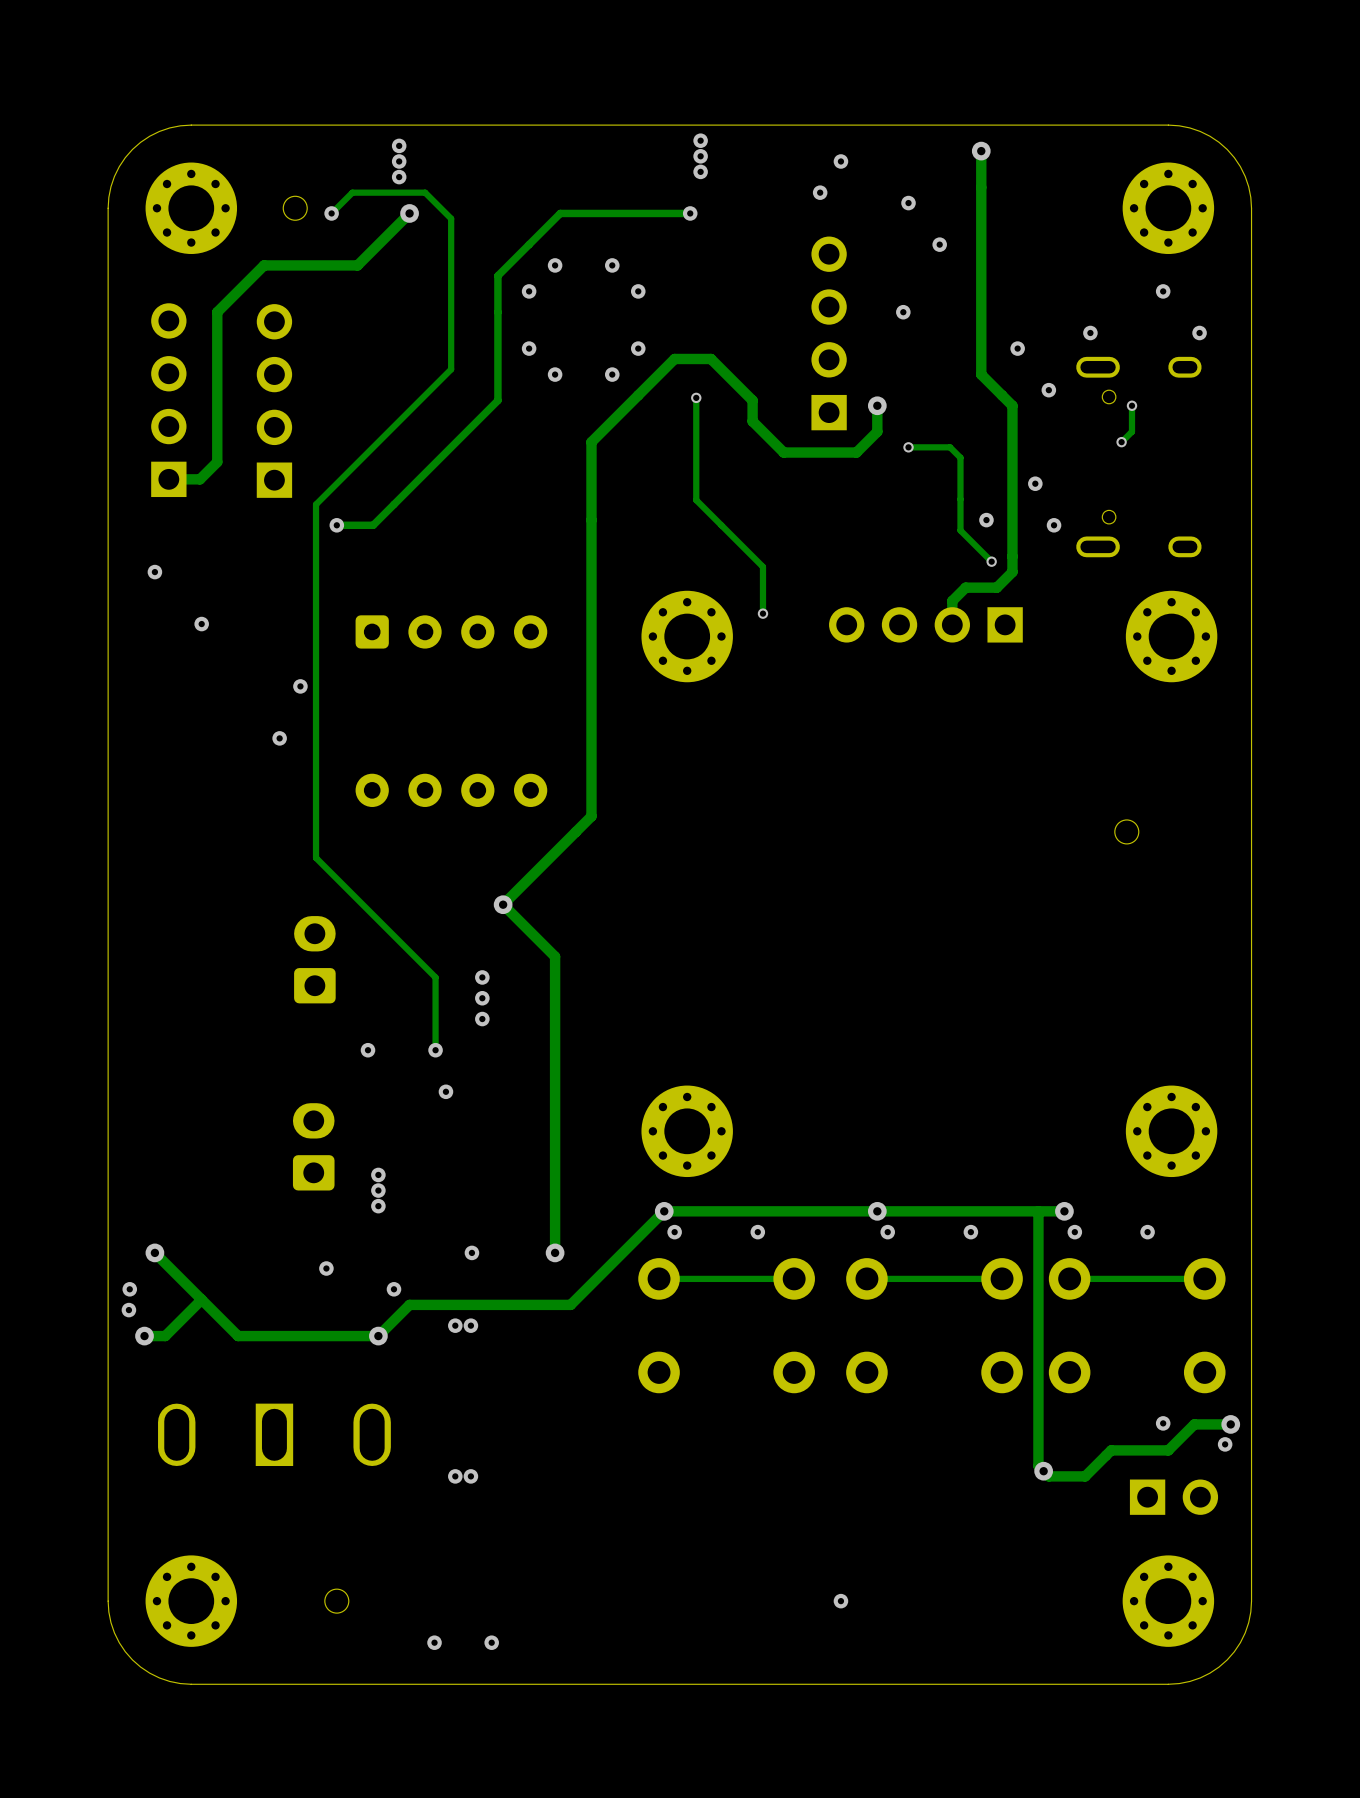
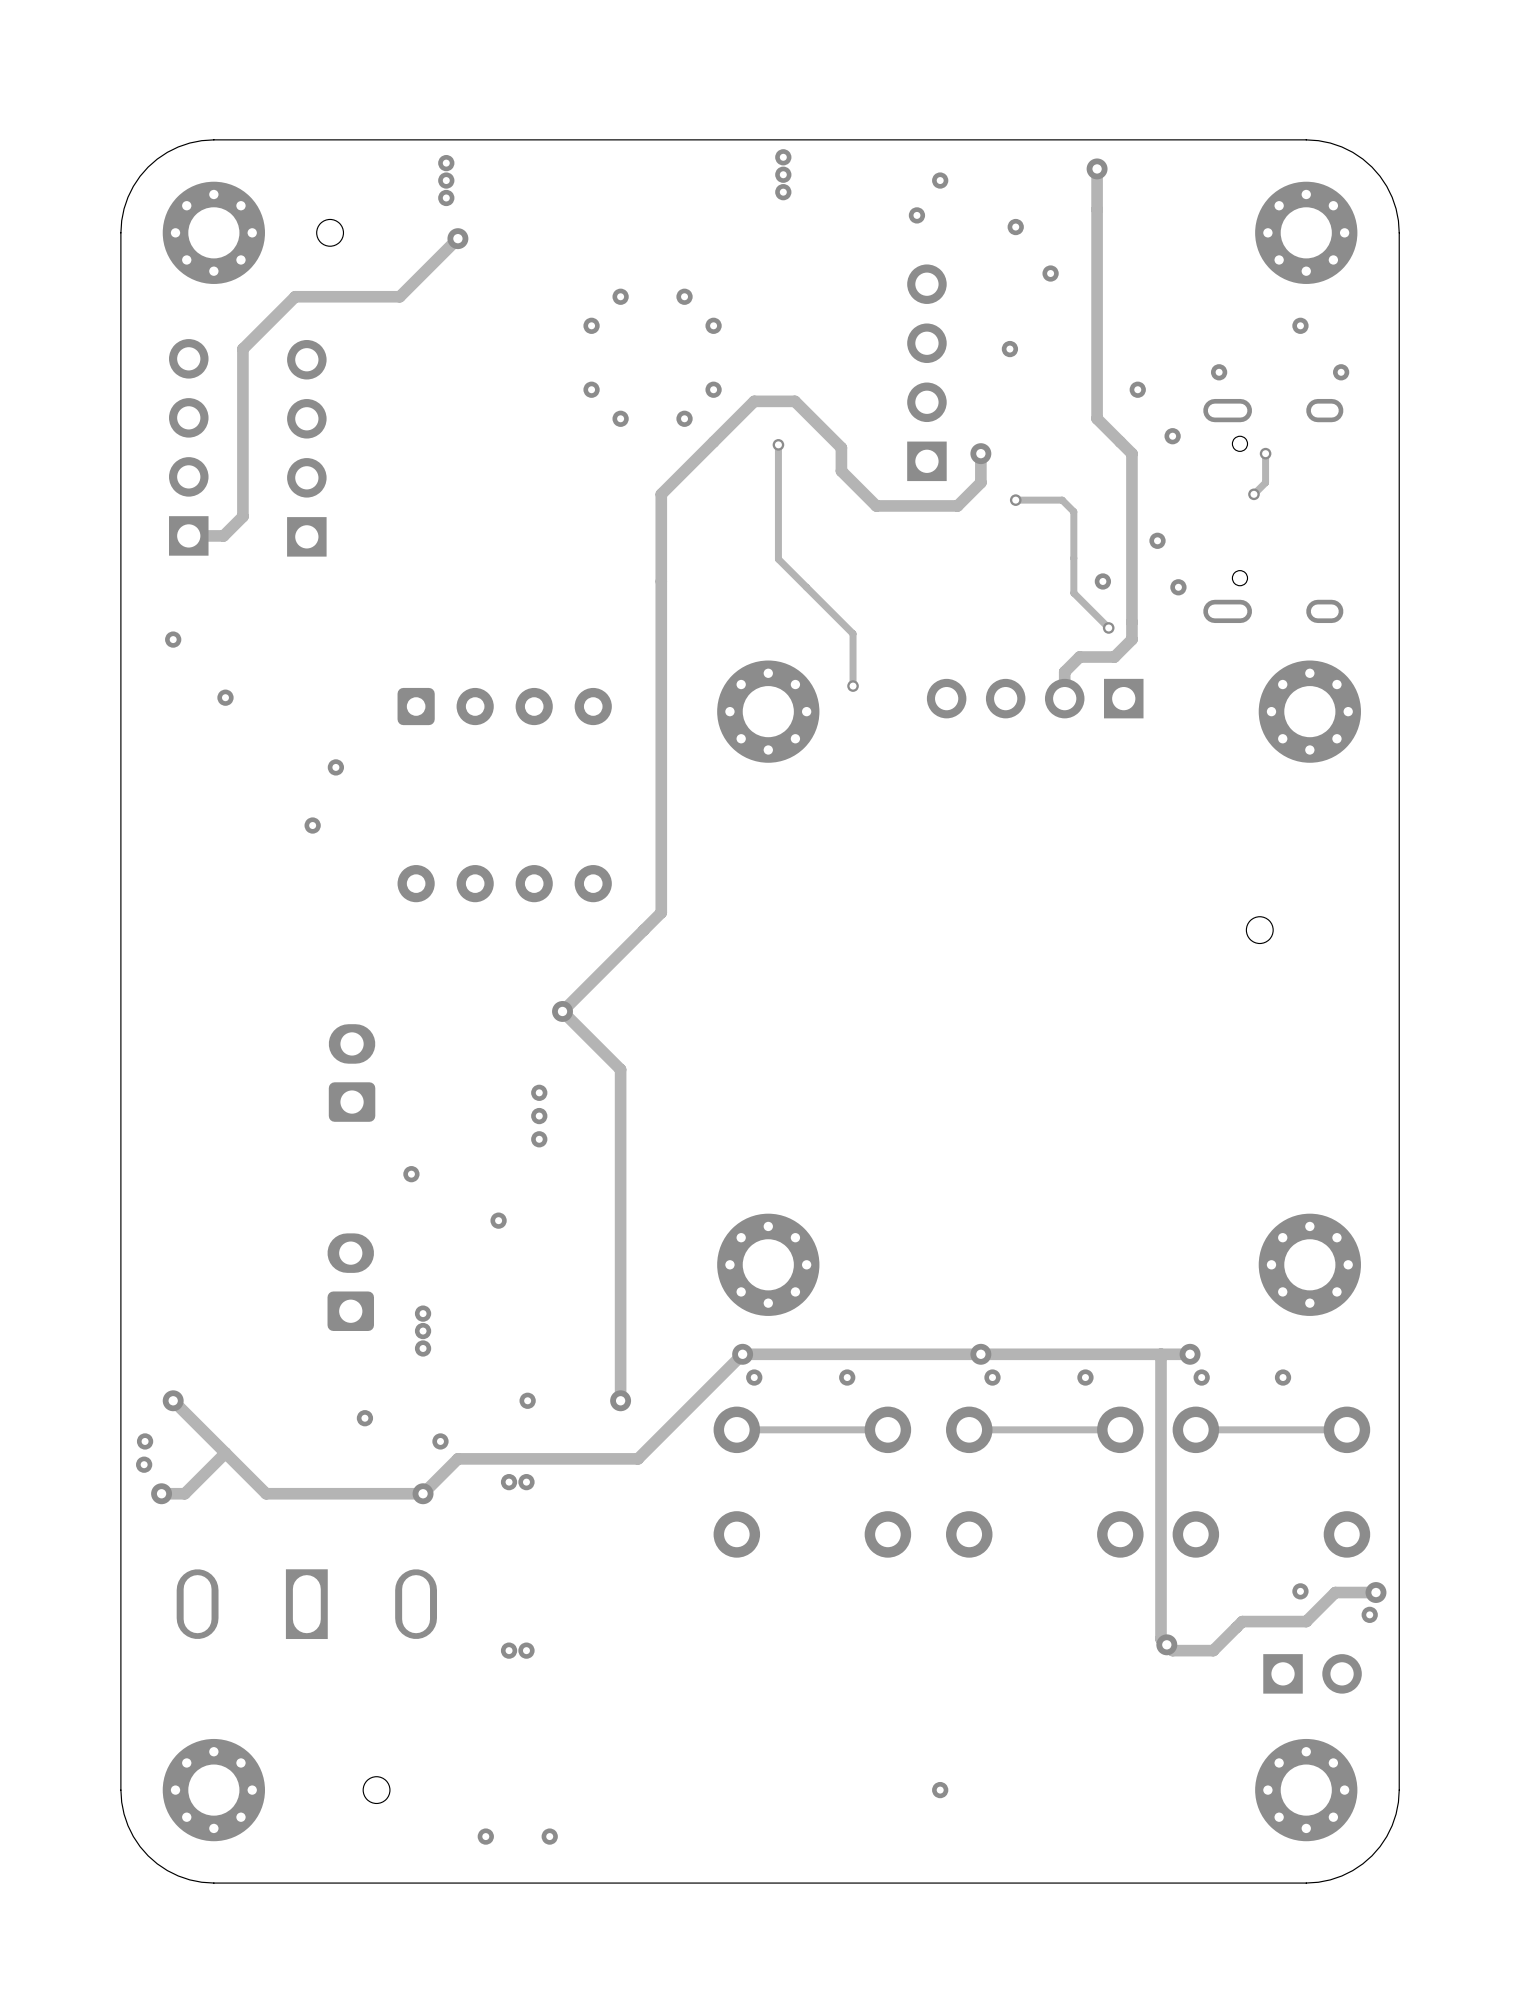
track: (331, 213) (352, 192) (425, 192) (451, 218) (451, 369) (316, 504) (316, 857) (435, 977) (435, 1050) -> none
via: (331, 213) -> none
track: (690, 213) (560, 213) (497, 275) (497, 400) (373, 525) (336, 525) -> none
via: (690, 213) -> none
via: (336, 525) -> none
via: (435, 1050) -> none

